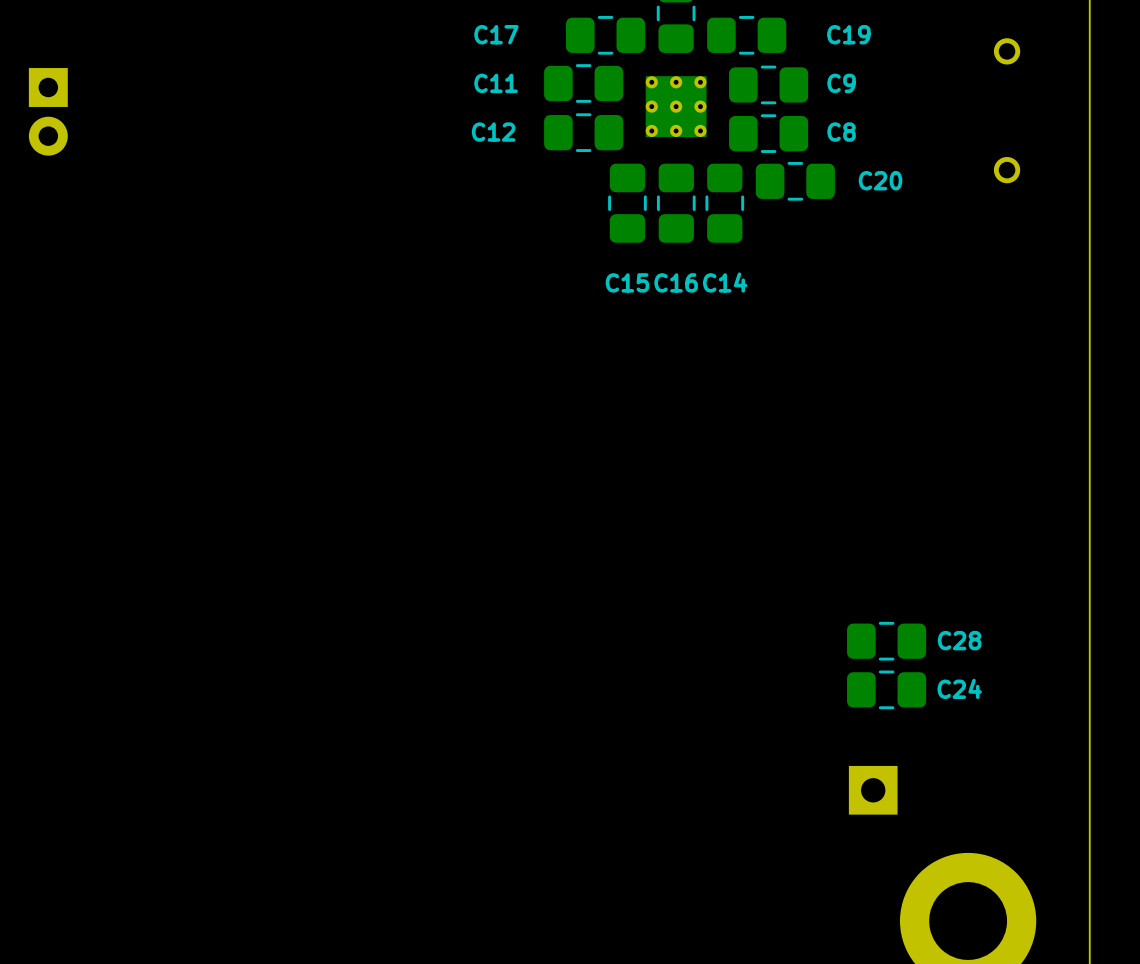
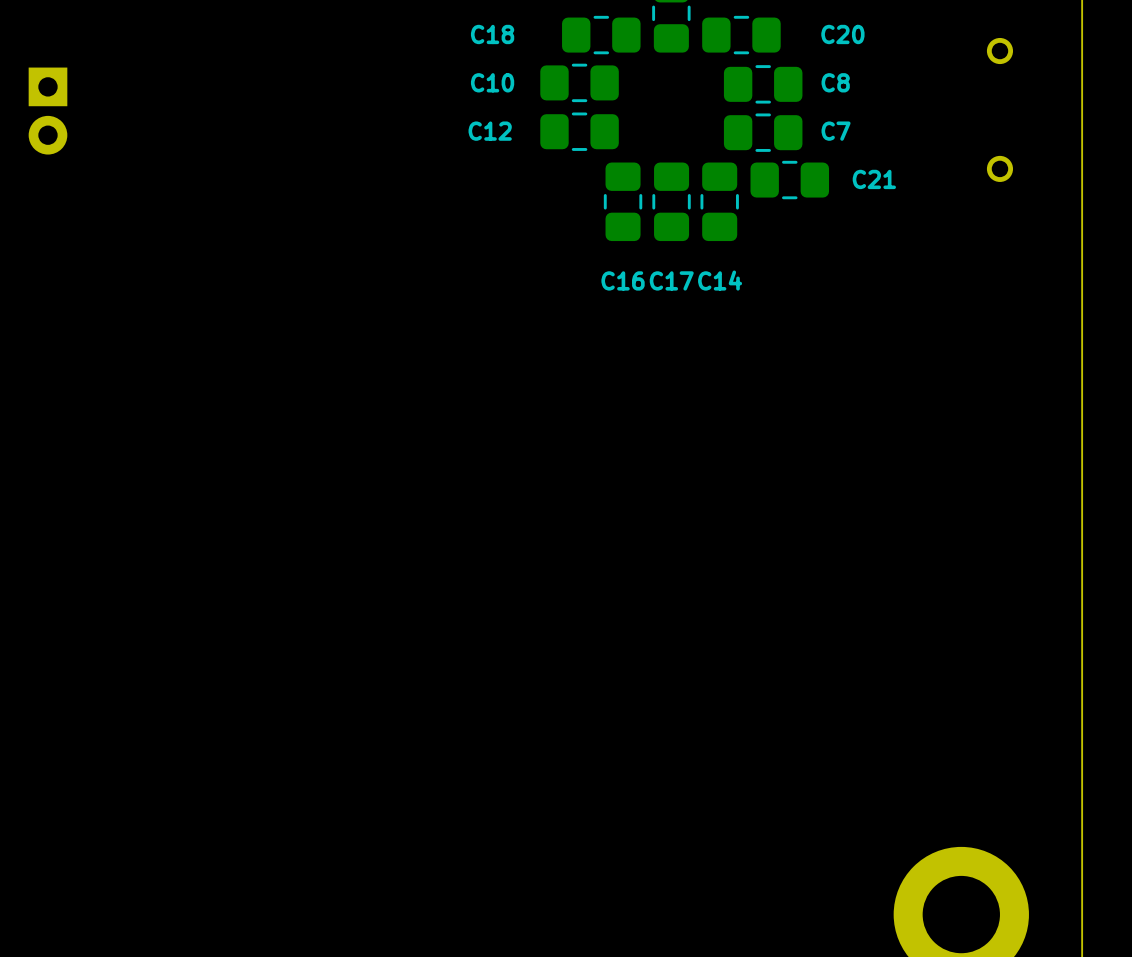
C17 name: C17 (496, 34) -> C18 (492, 34)
C19 name: C19 (848, 34) -> C20 (842, 34)
C11 name: C11 (496, 83) -> C10 (492, 82)
C9 name: C9 (841, 83) -> C8 (835, 82)
part: (676, 106) -> none
C8 name: C8 (841, 132) -> C7 (836, 131)
C20 name: C20 (880, 180) -> C21 (874, 179)
C15 name: C15 (627, 282) -> C16 (623, 280)
C16 name: C16 (676, 282) -> C17 (671, 280)
C28: (886, 641) -> none
C24: (886, 689) -> none
part: (873, 790) -> none

